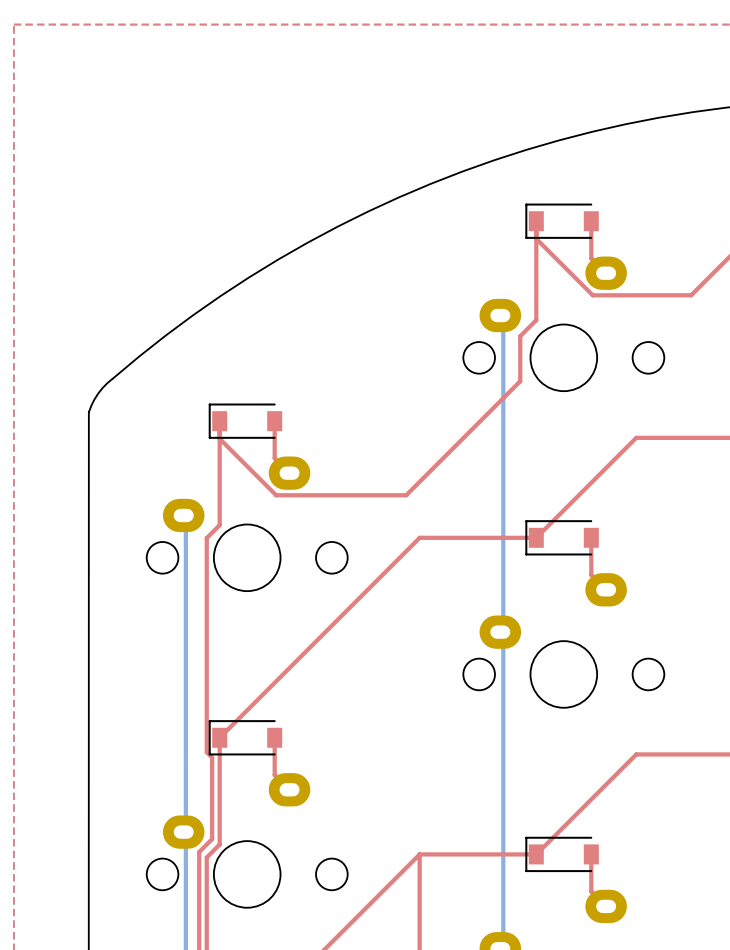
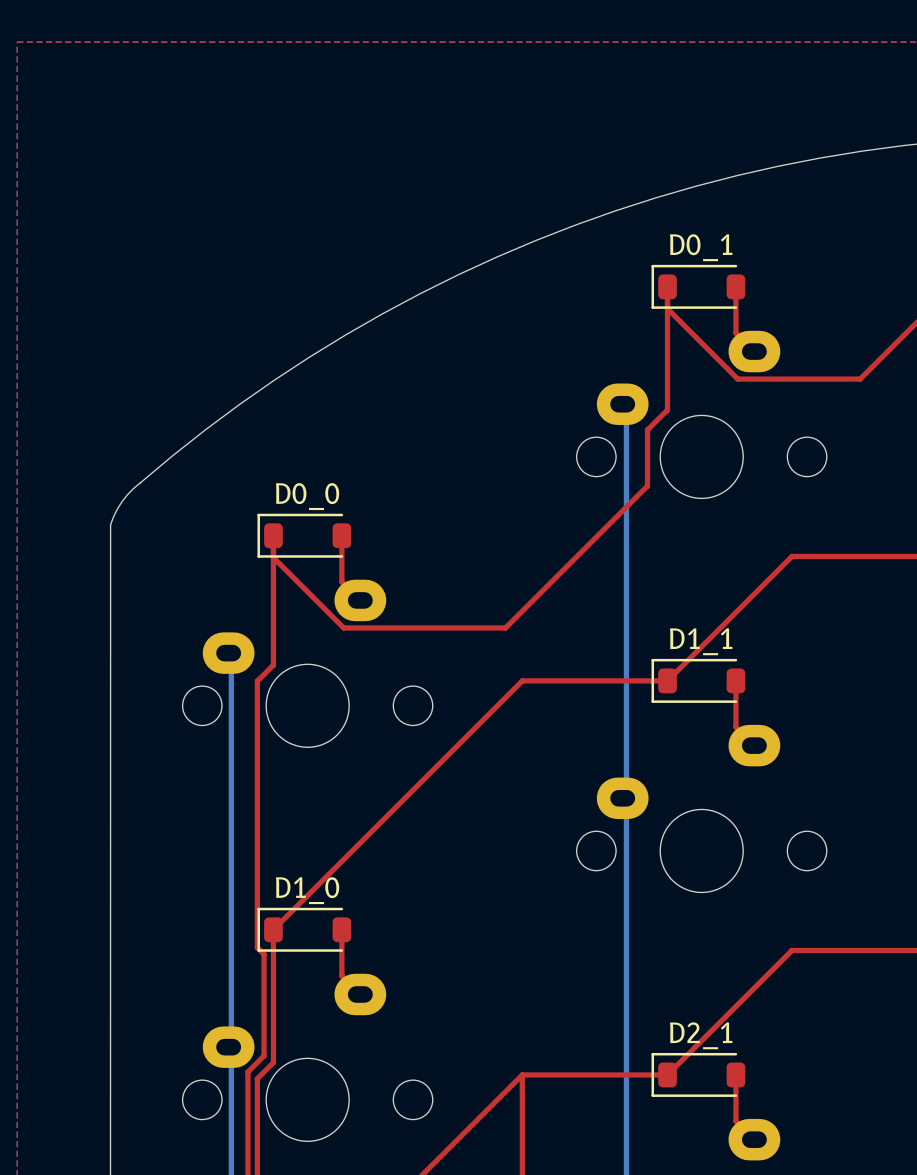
D0_1: none -> (698, 286)
part: (562, 221) -> none
D0_0: none -> (304, 535)
part: (245, 421) -> none
D1_1: none -> (698, 680)
part: (562, 537) -> none
D1_0: none -> (304, 929)
part: (245, 737) -> none
D2_1: none -> (698, 1074)
part: (562, 854) -> none

